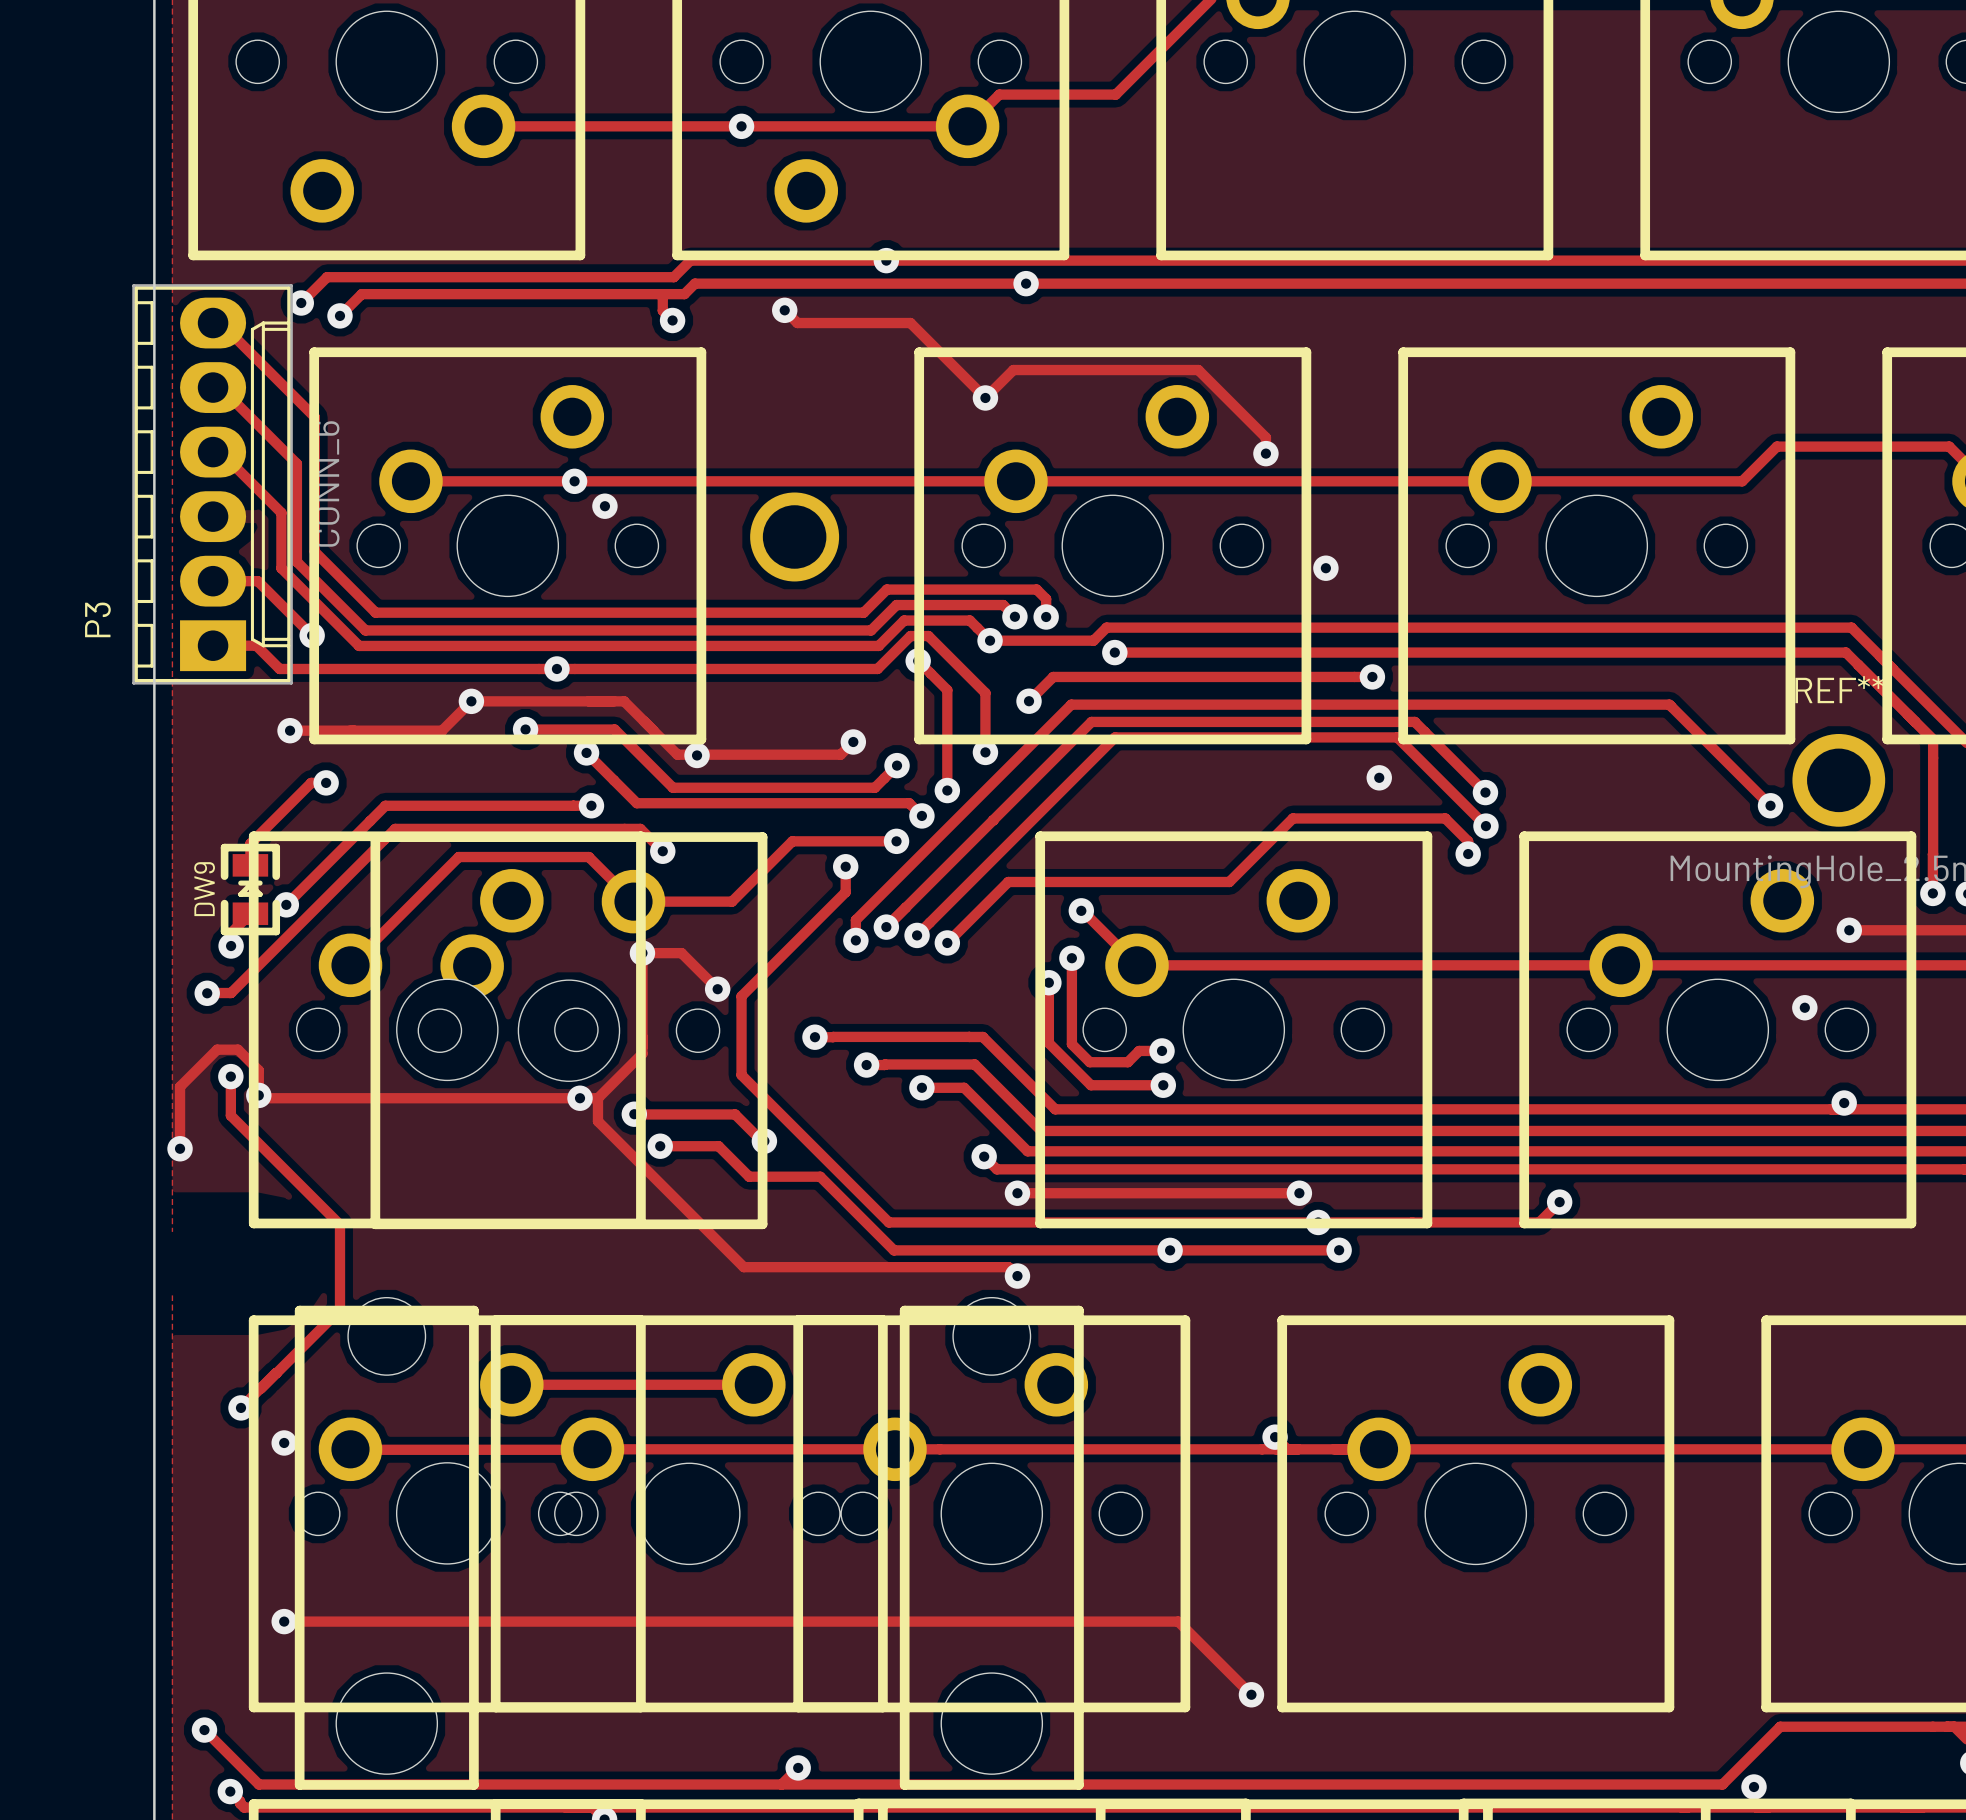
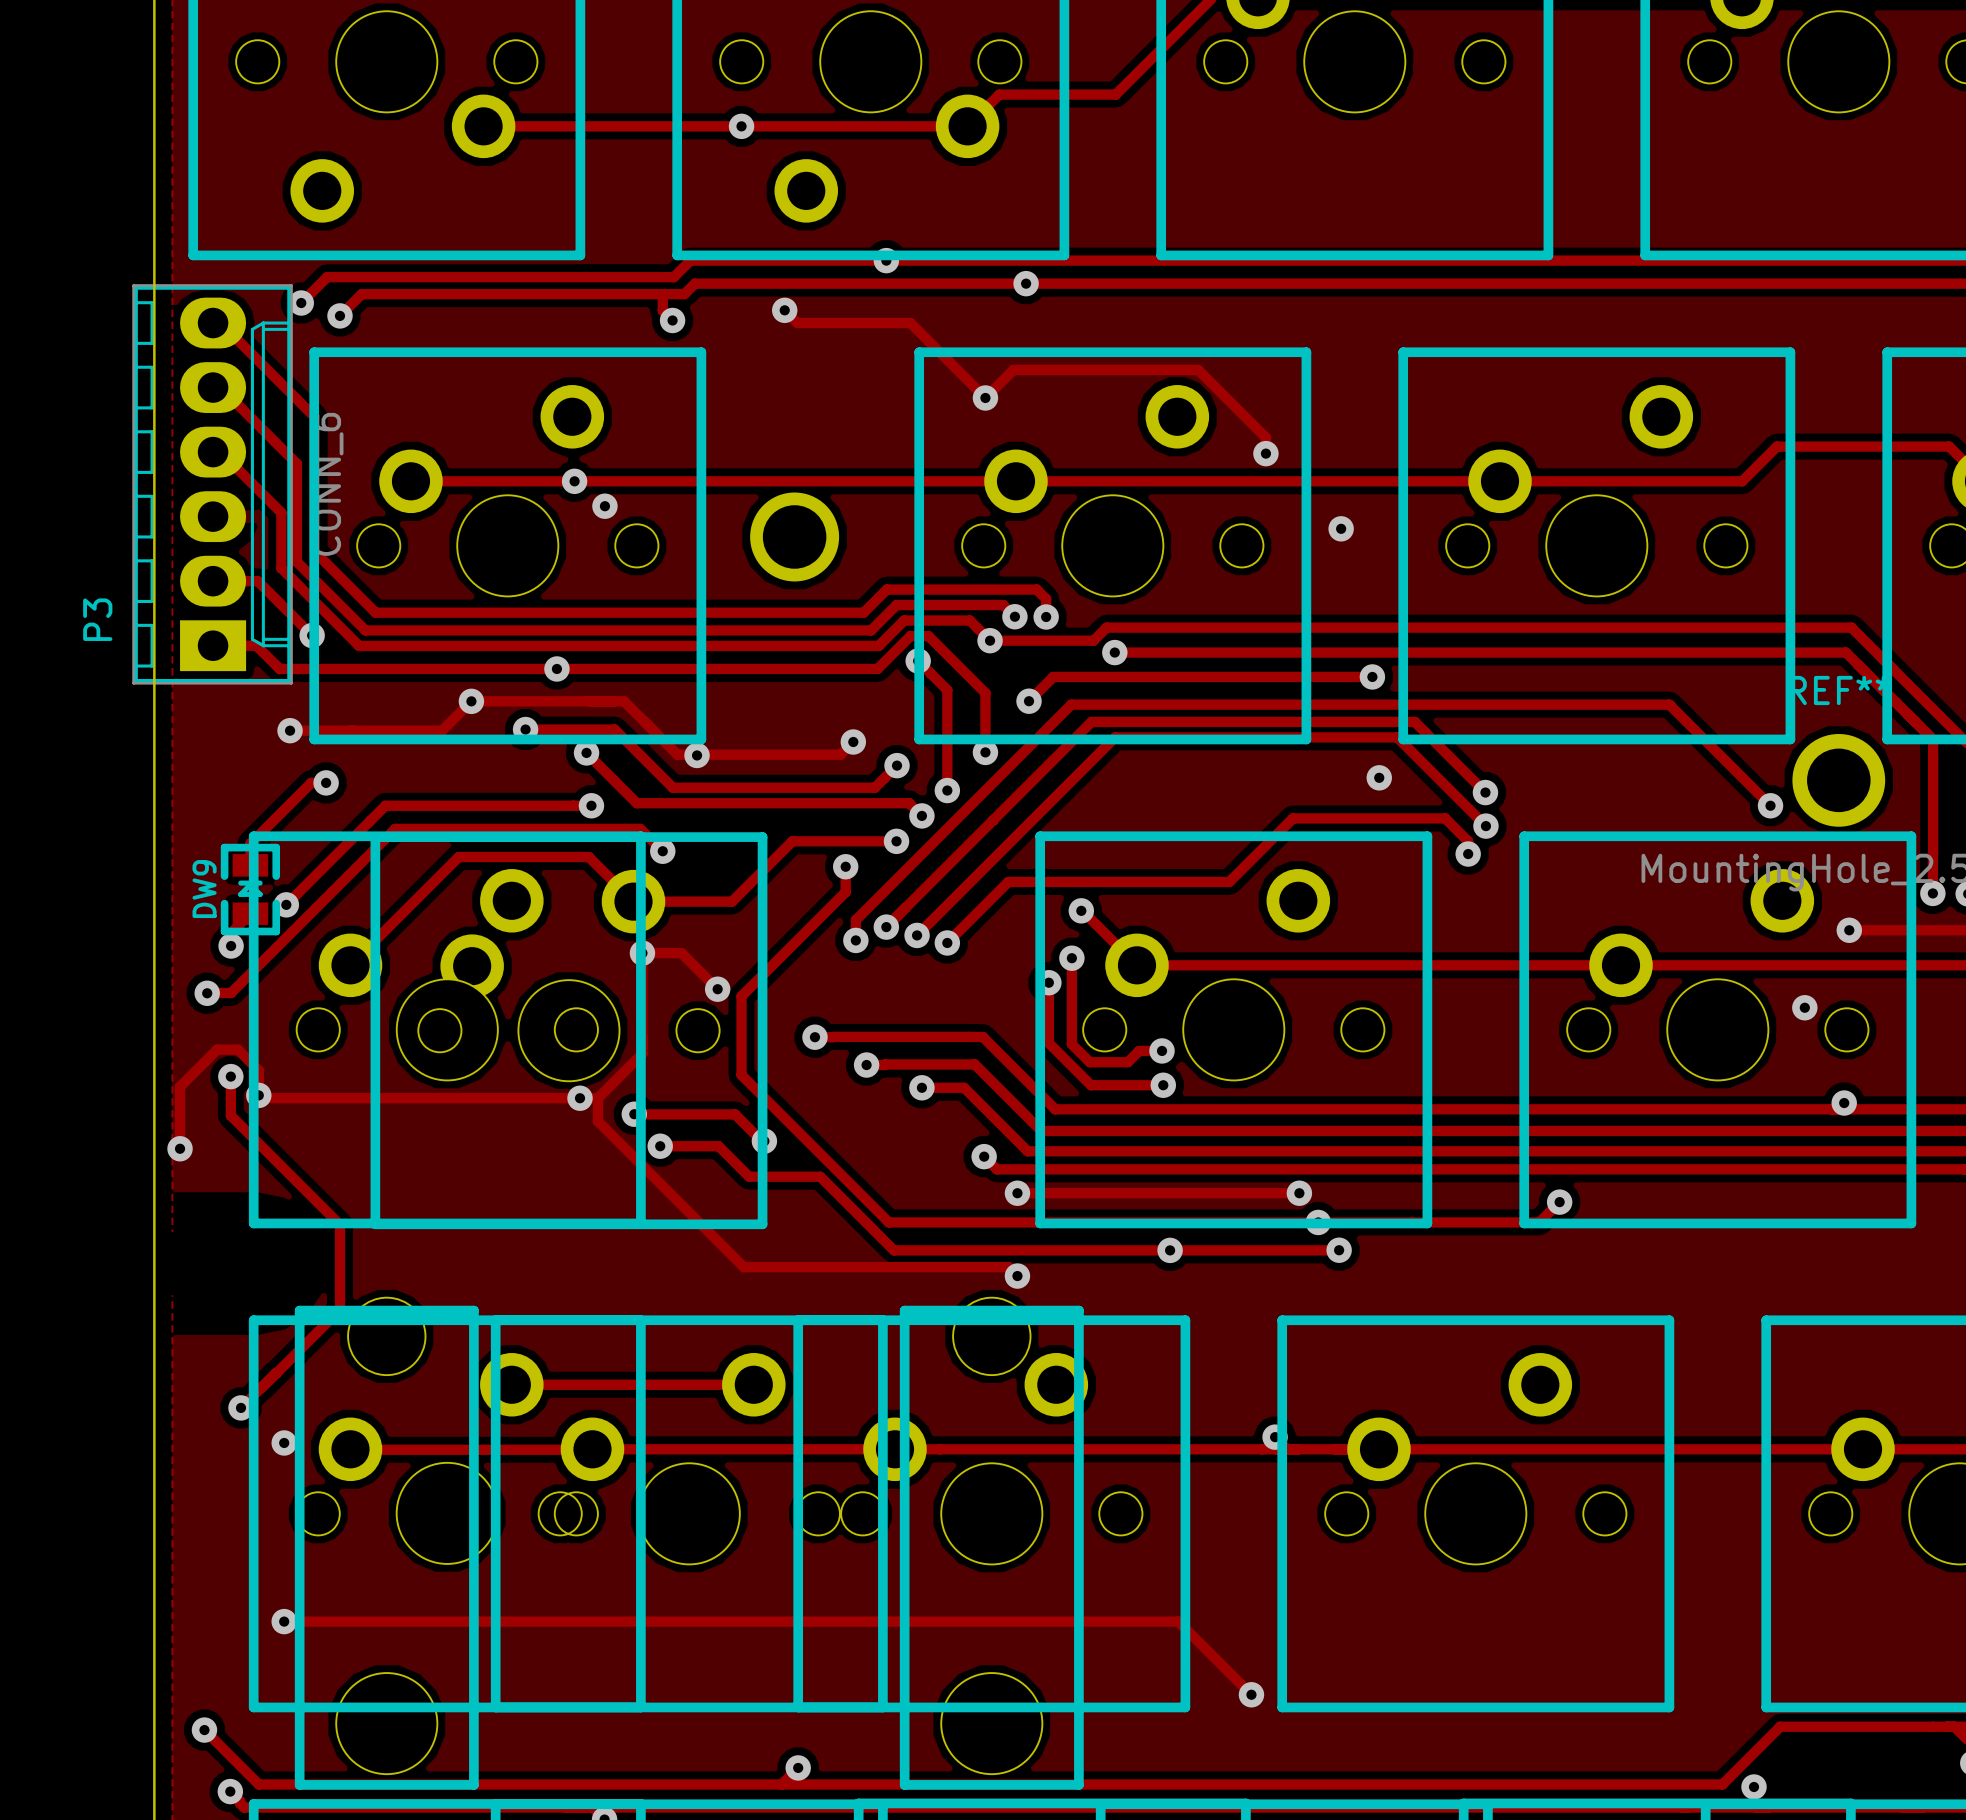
via position: (1325, 568) -> (1341, 528)

